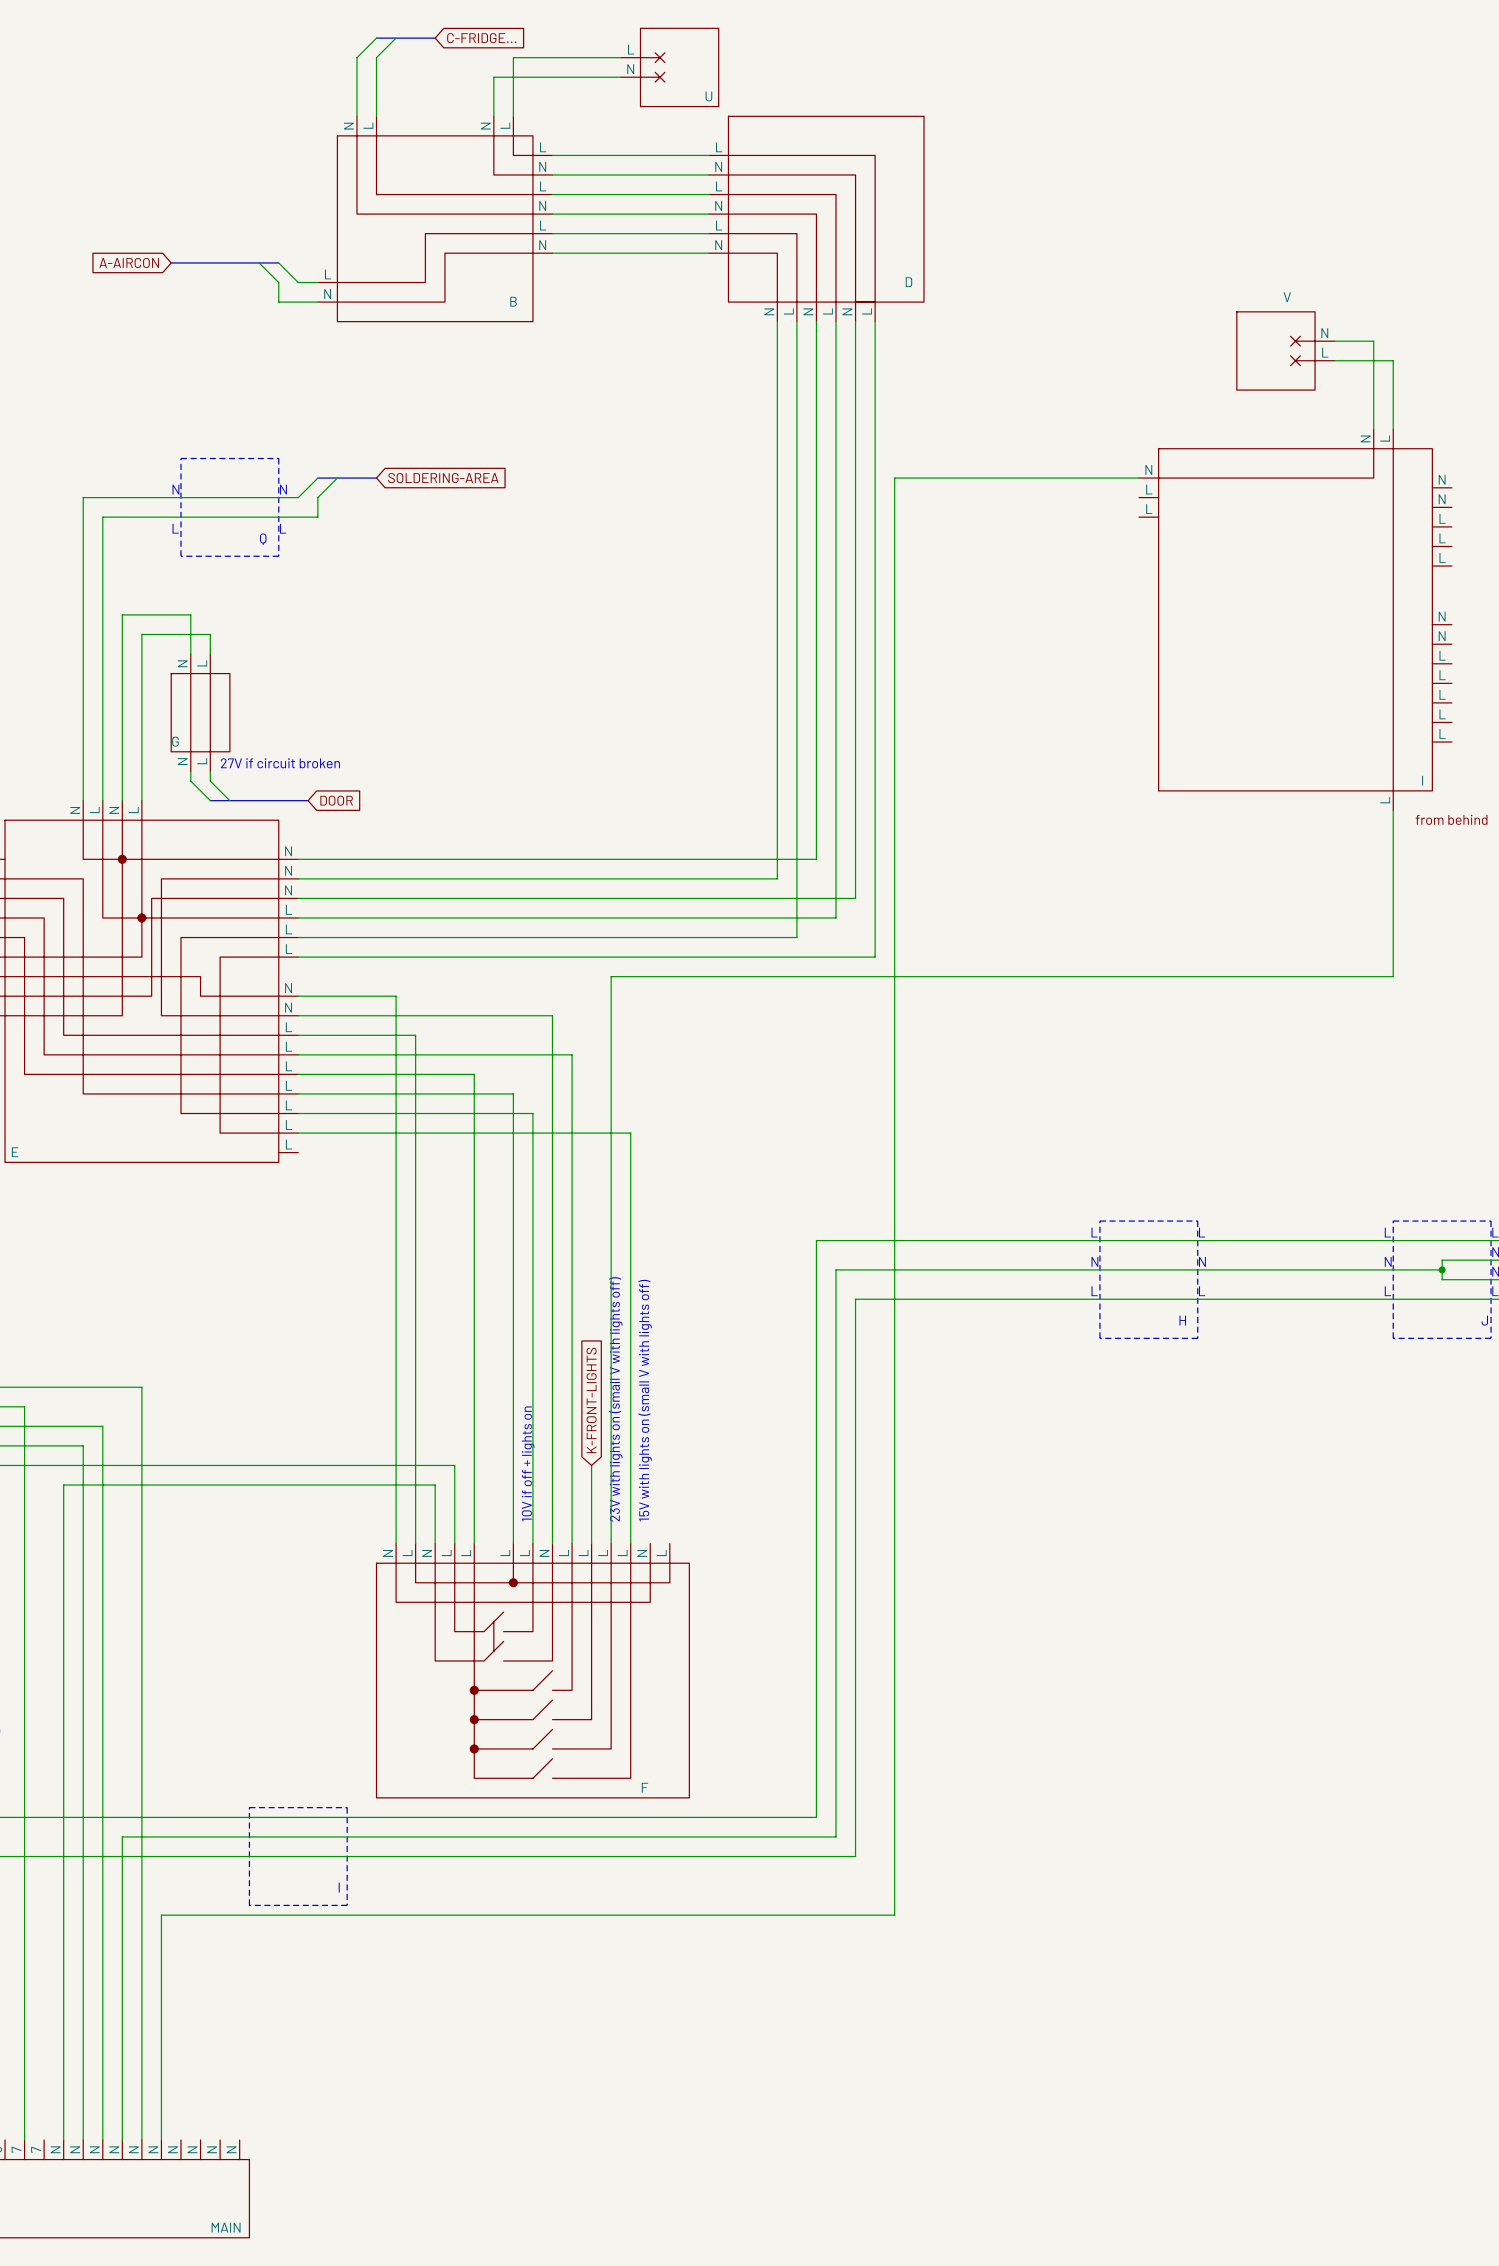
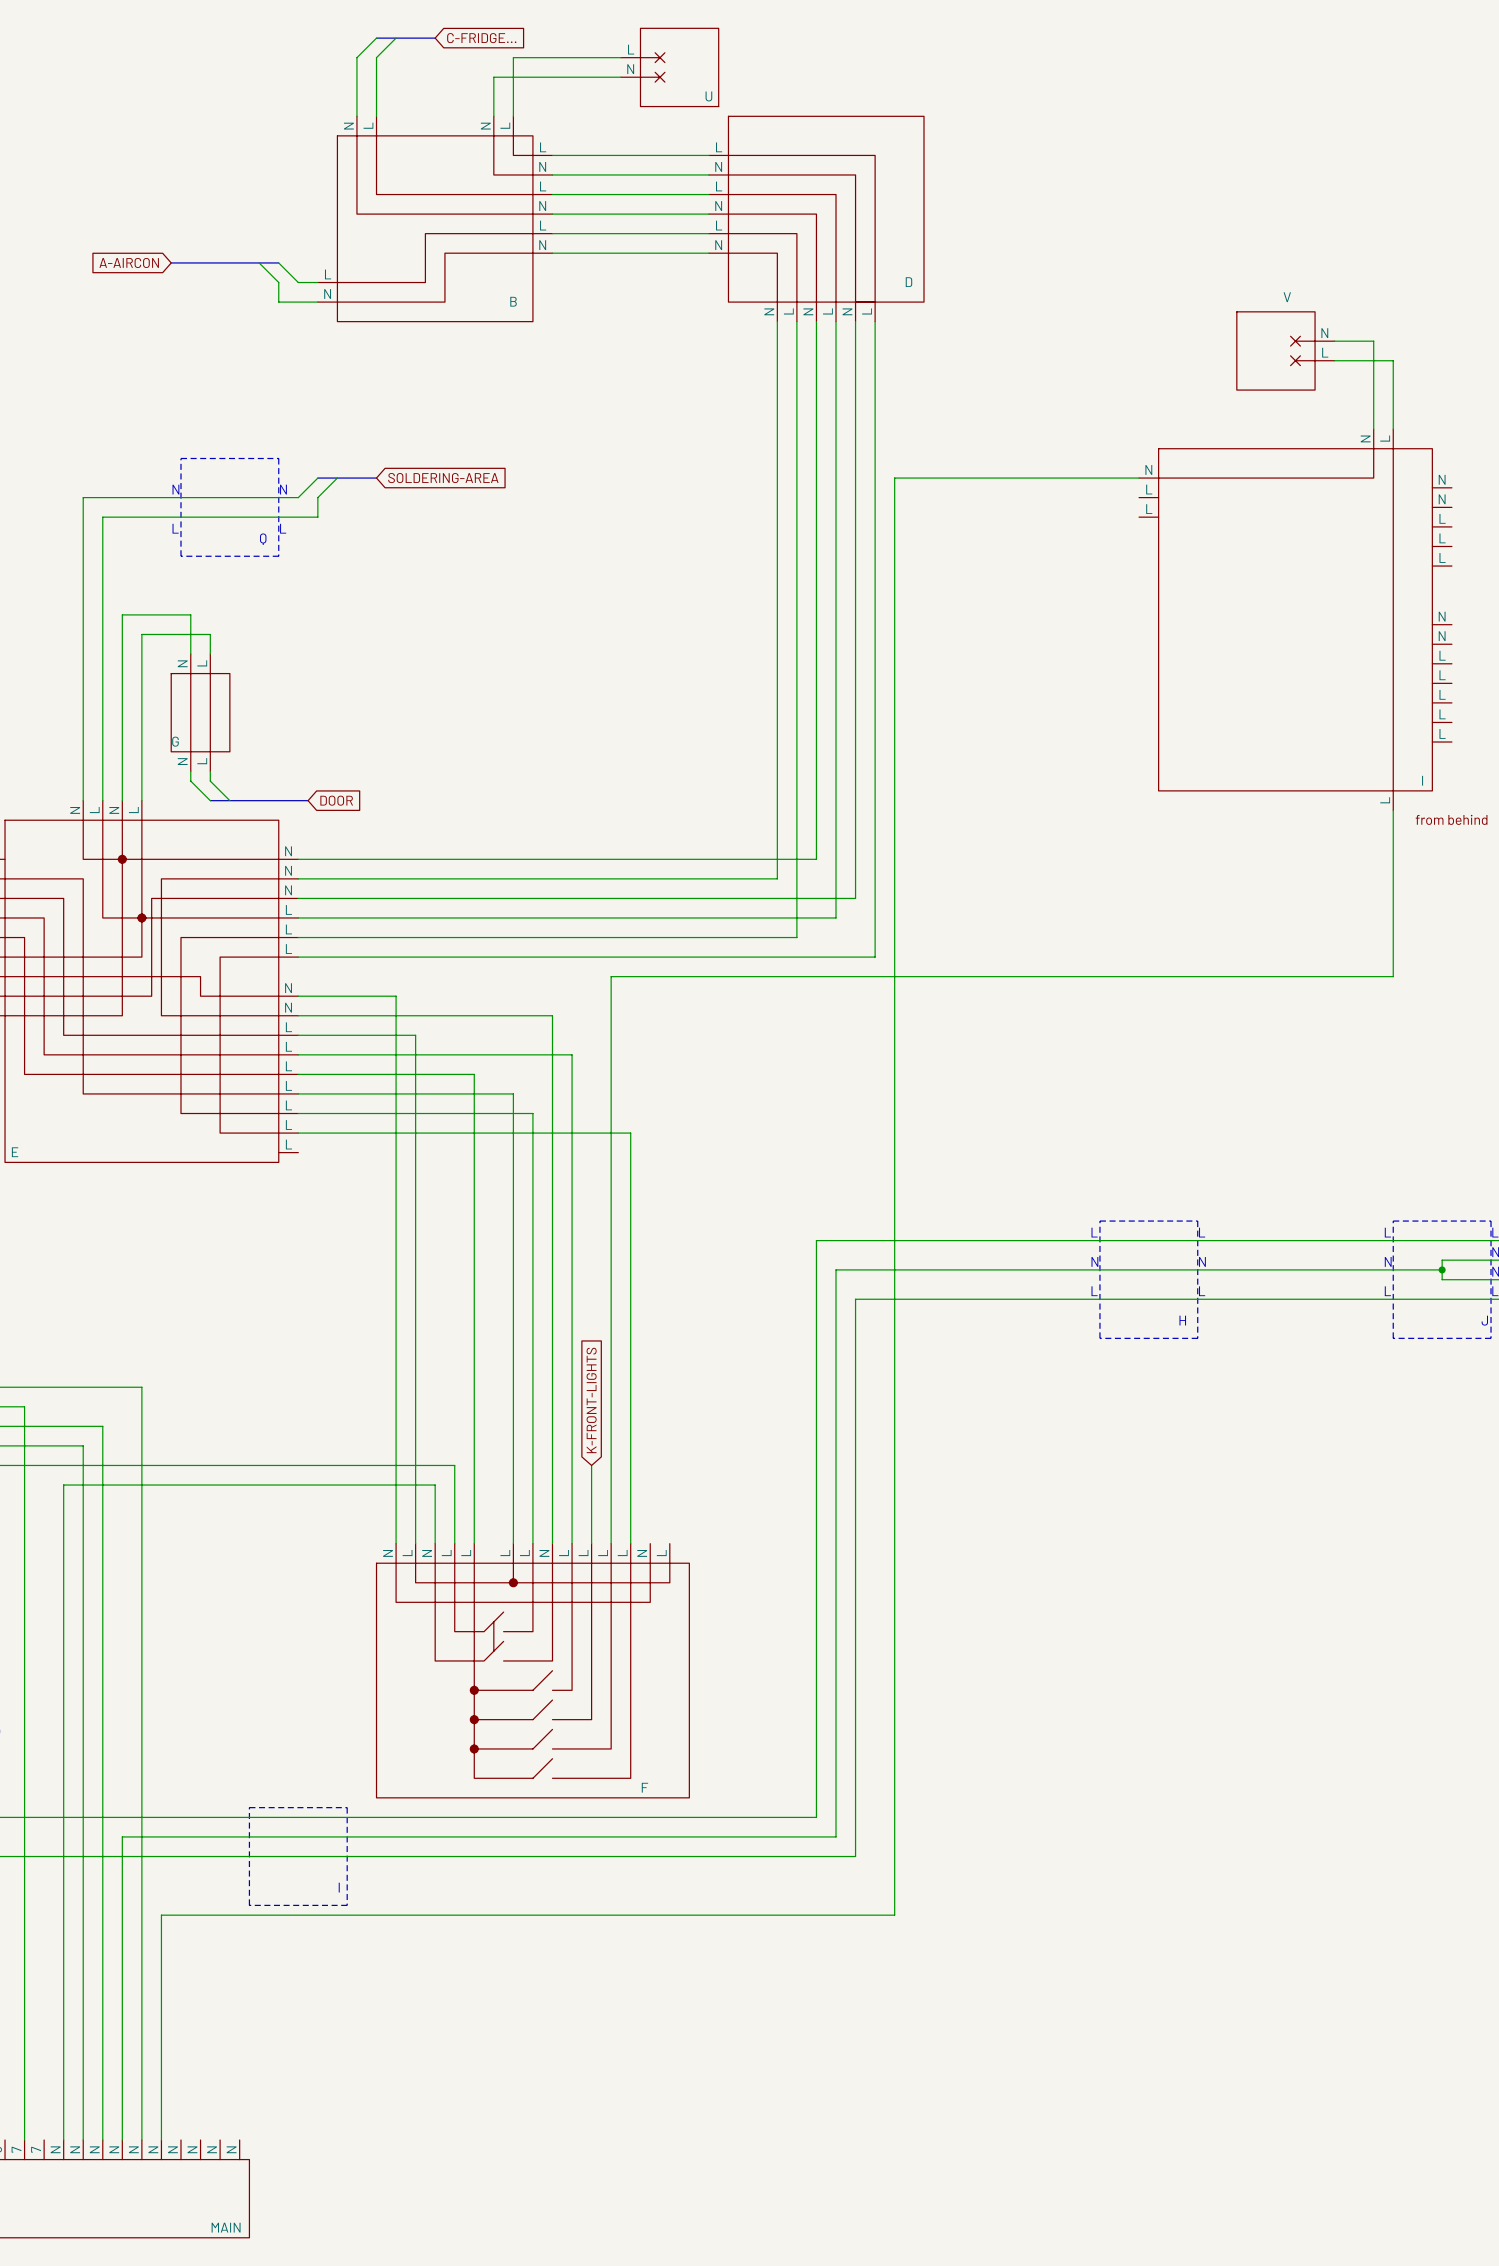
text: 27V if circuit broken (280, 763) -> none
text: 23V with lights on (small V with lights off) (615, 1399) -> none
text: 15V with lights on (small V with lights off) (645, 1400) -> none
text: 10V if off + lights on (528, 1463) -> none

